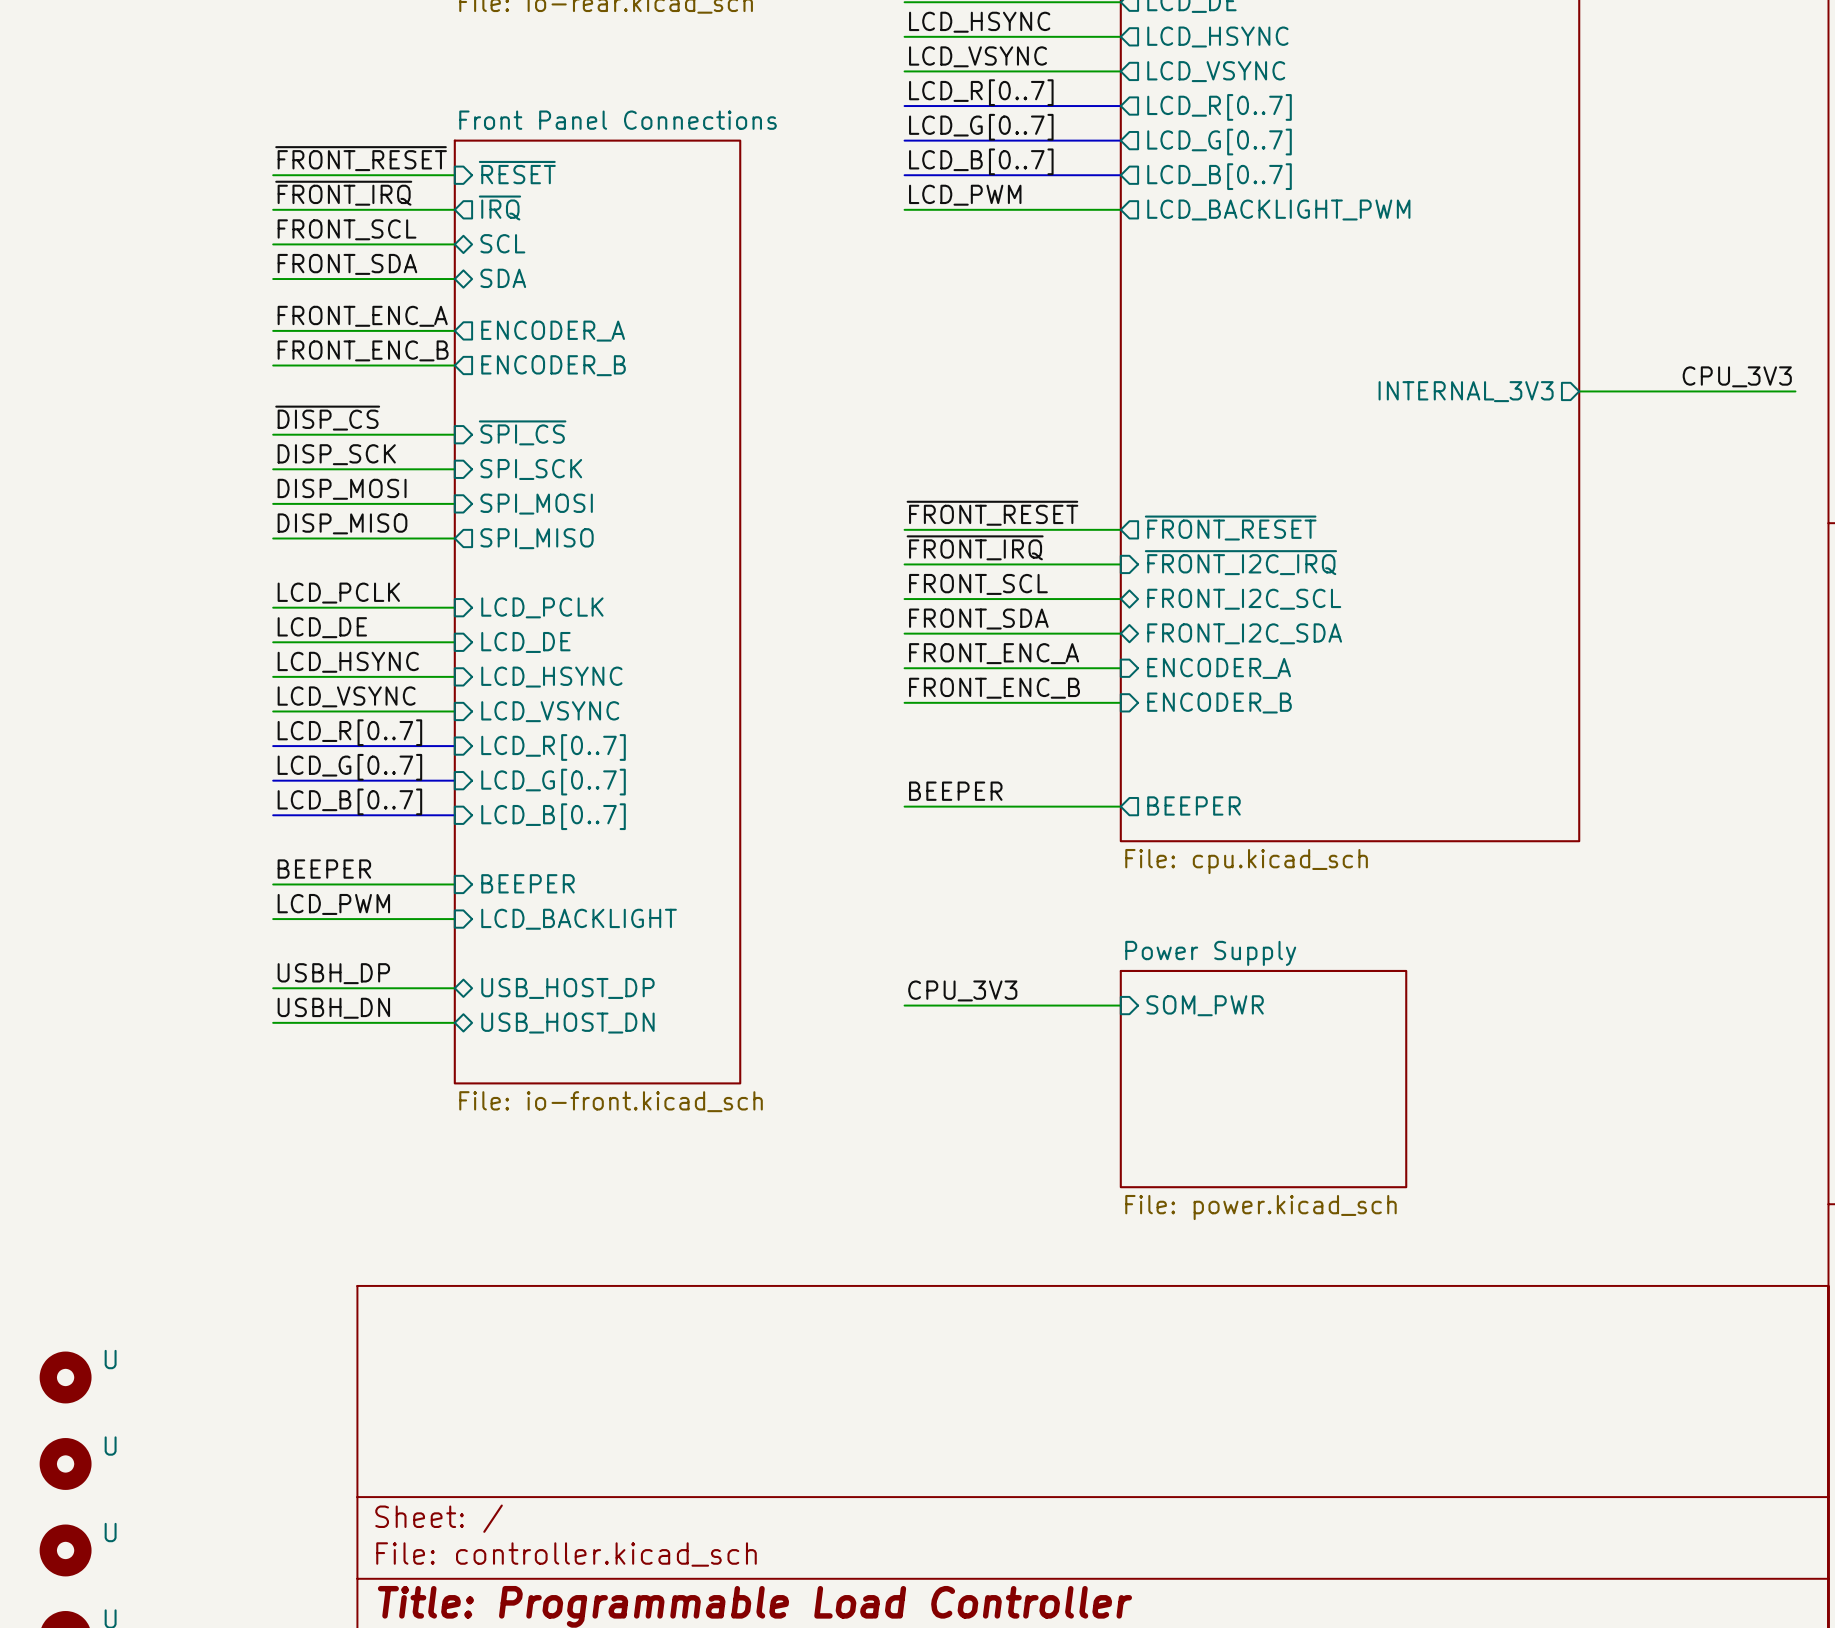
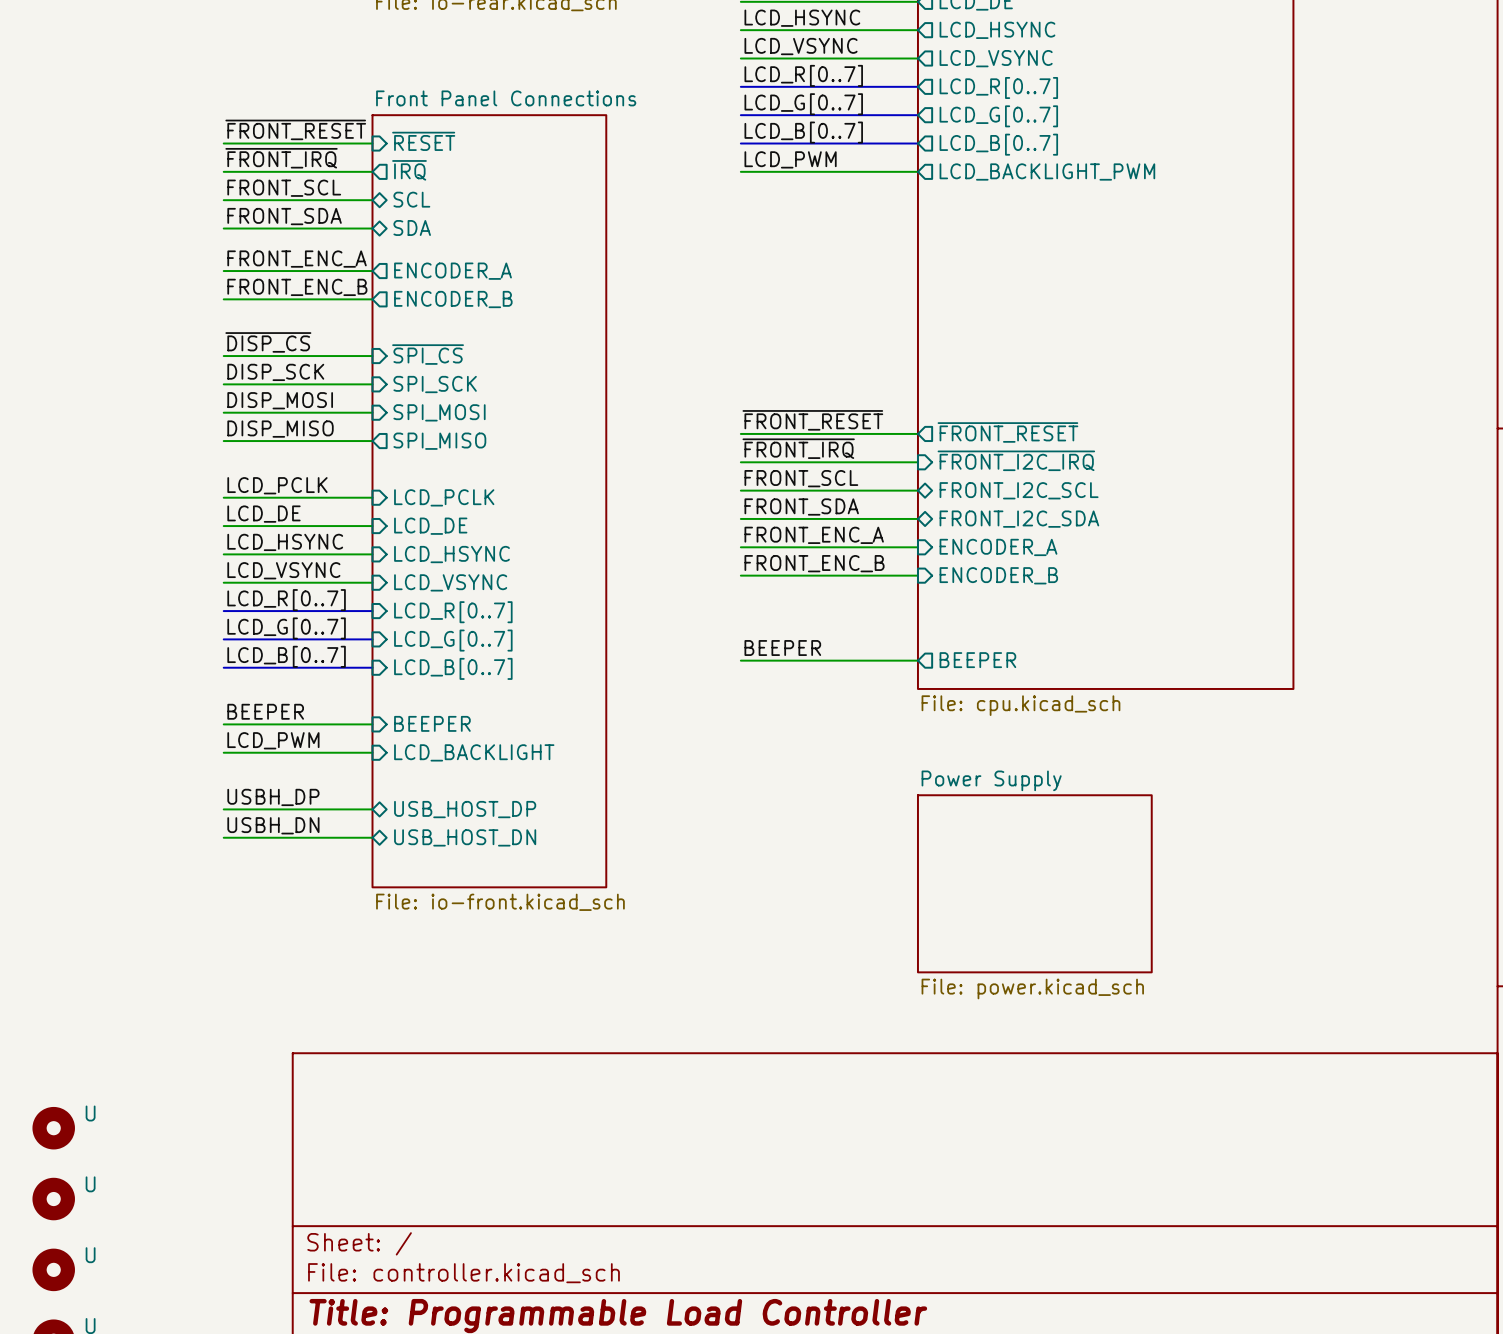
label: CPU_3V3 (1737, 376) -> none
sheet pin: INTERNAL_3V3 (1466, 391) -> none
wire: (1579, 391) (1795, 391) -> none
label: CPU_3V3 (962, 990) -> none
wire: (904, 1005) (1120, 1005) -> none
sheet pin: SOM_PWR (1205, 1005) -> none

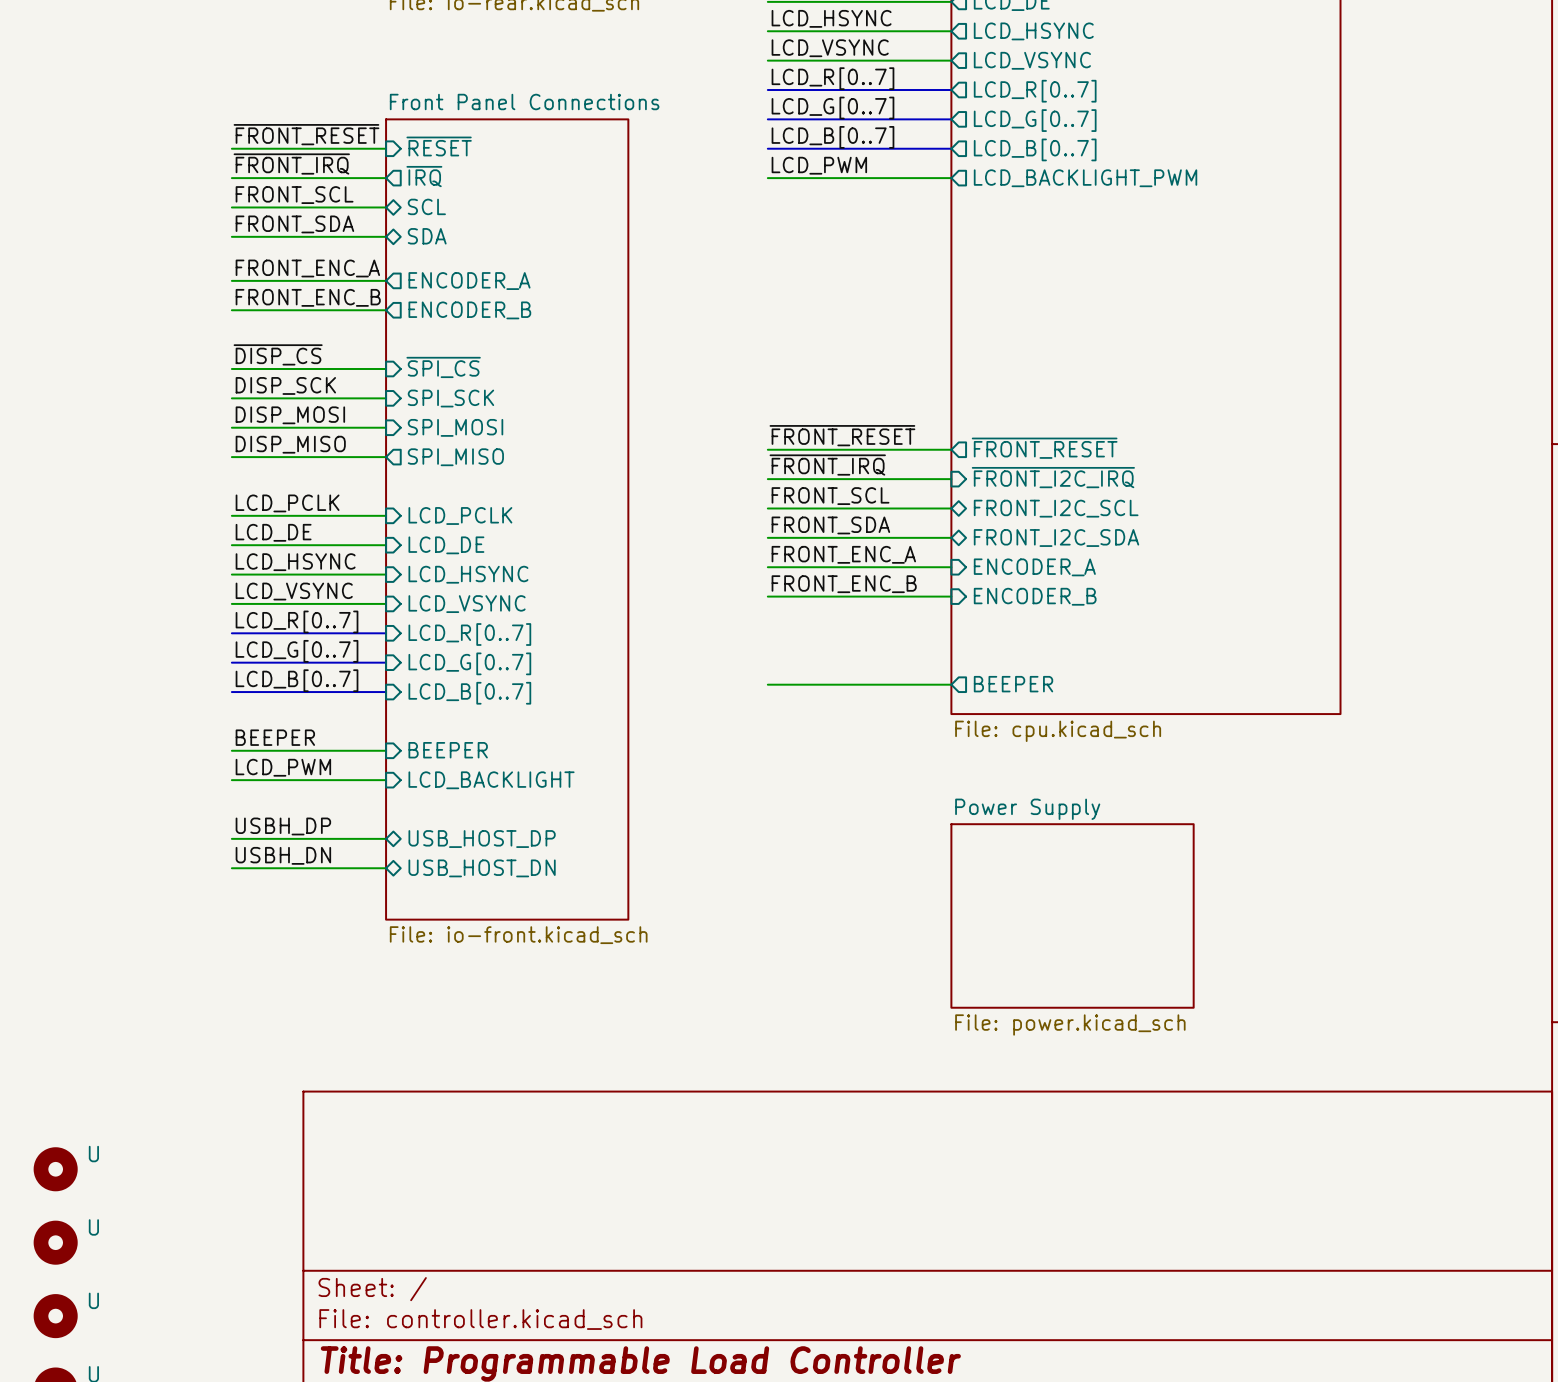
label: BEEPER (782, 648) -> none

